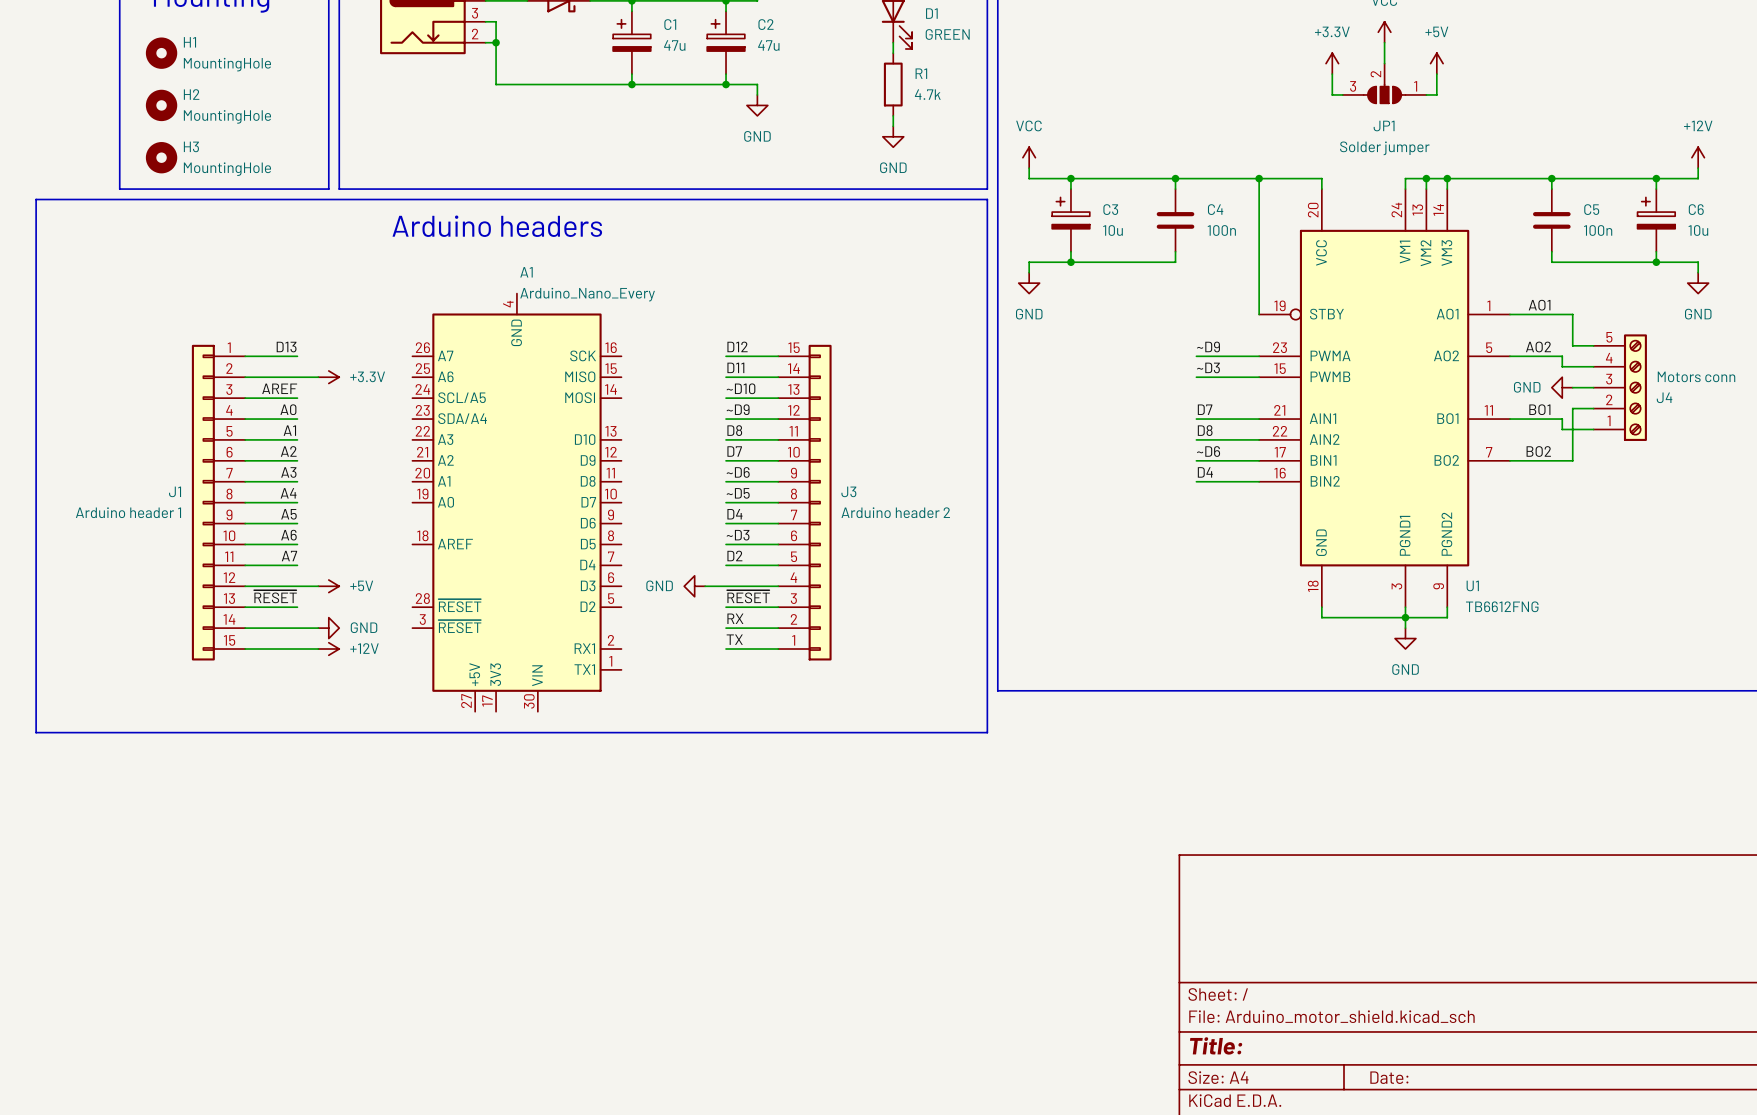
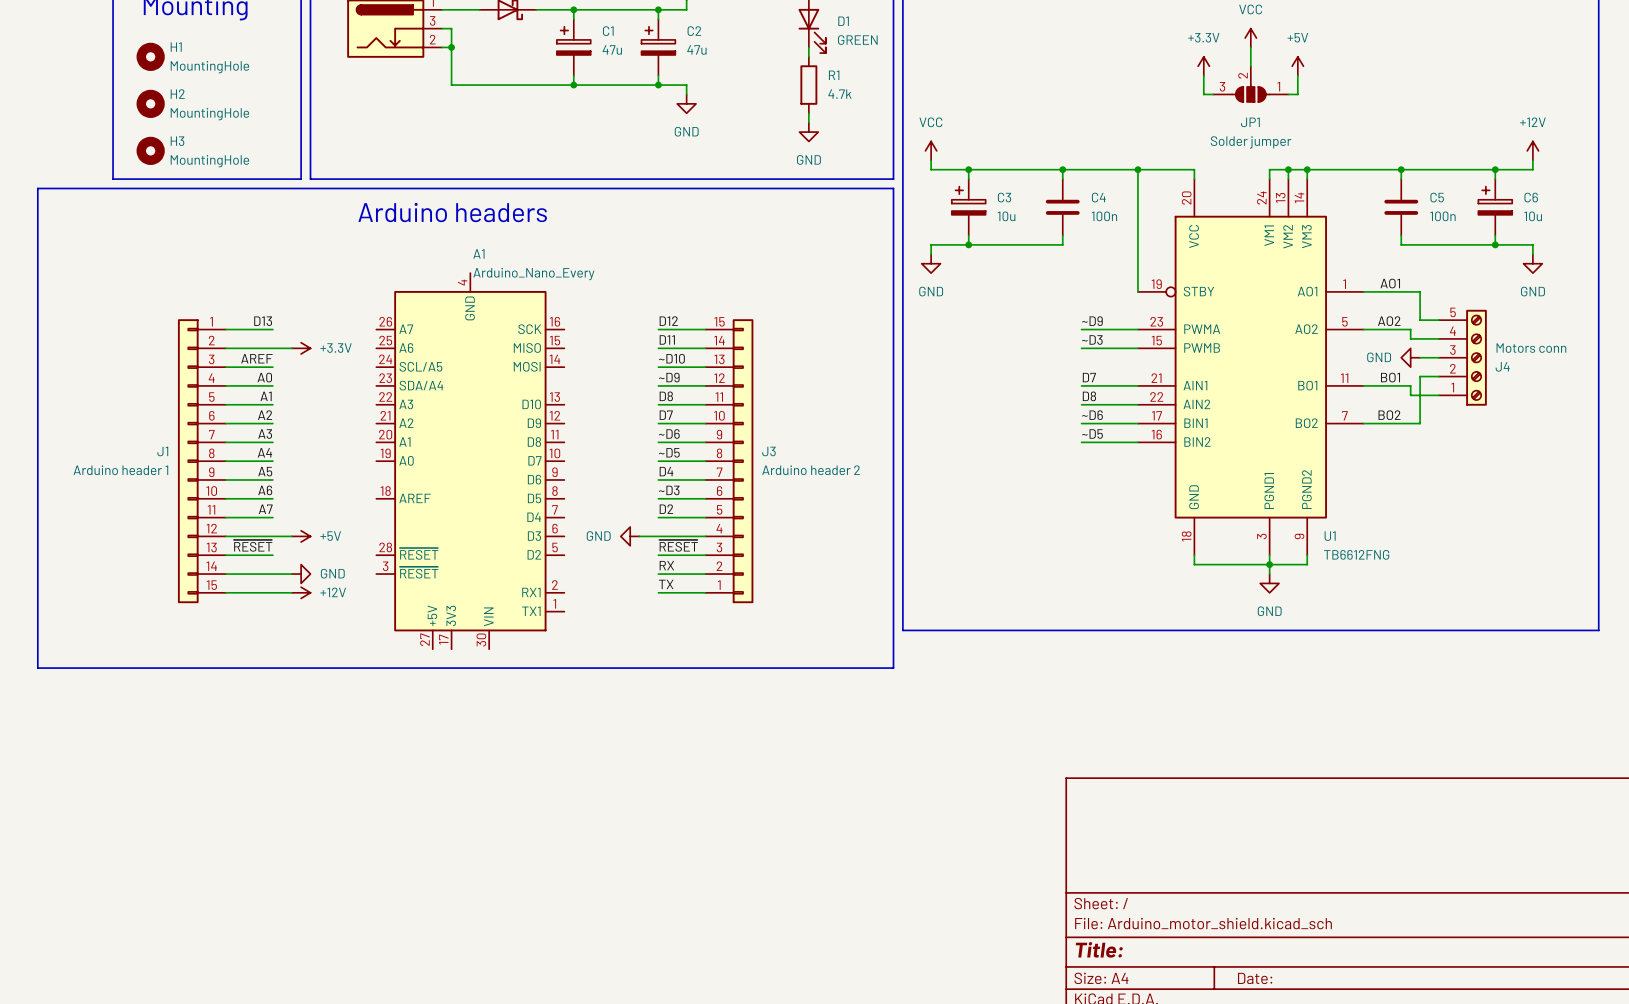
label: D4 (1205, 472) -> ~D5 (1092, 434)

